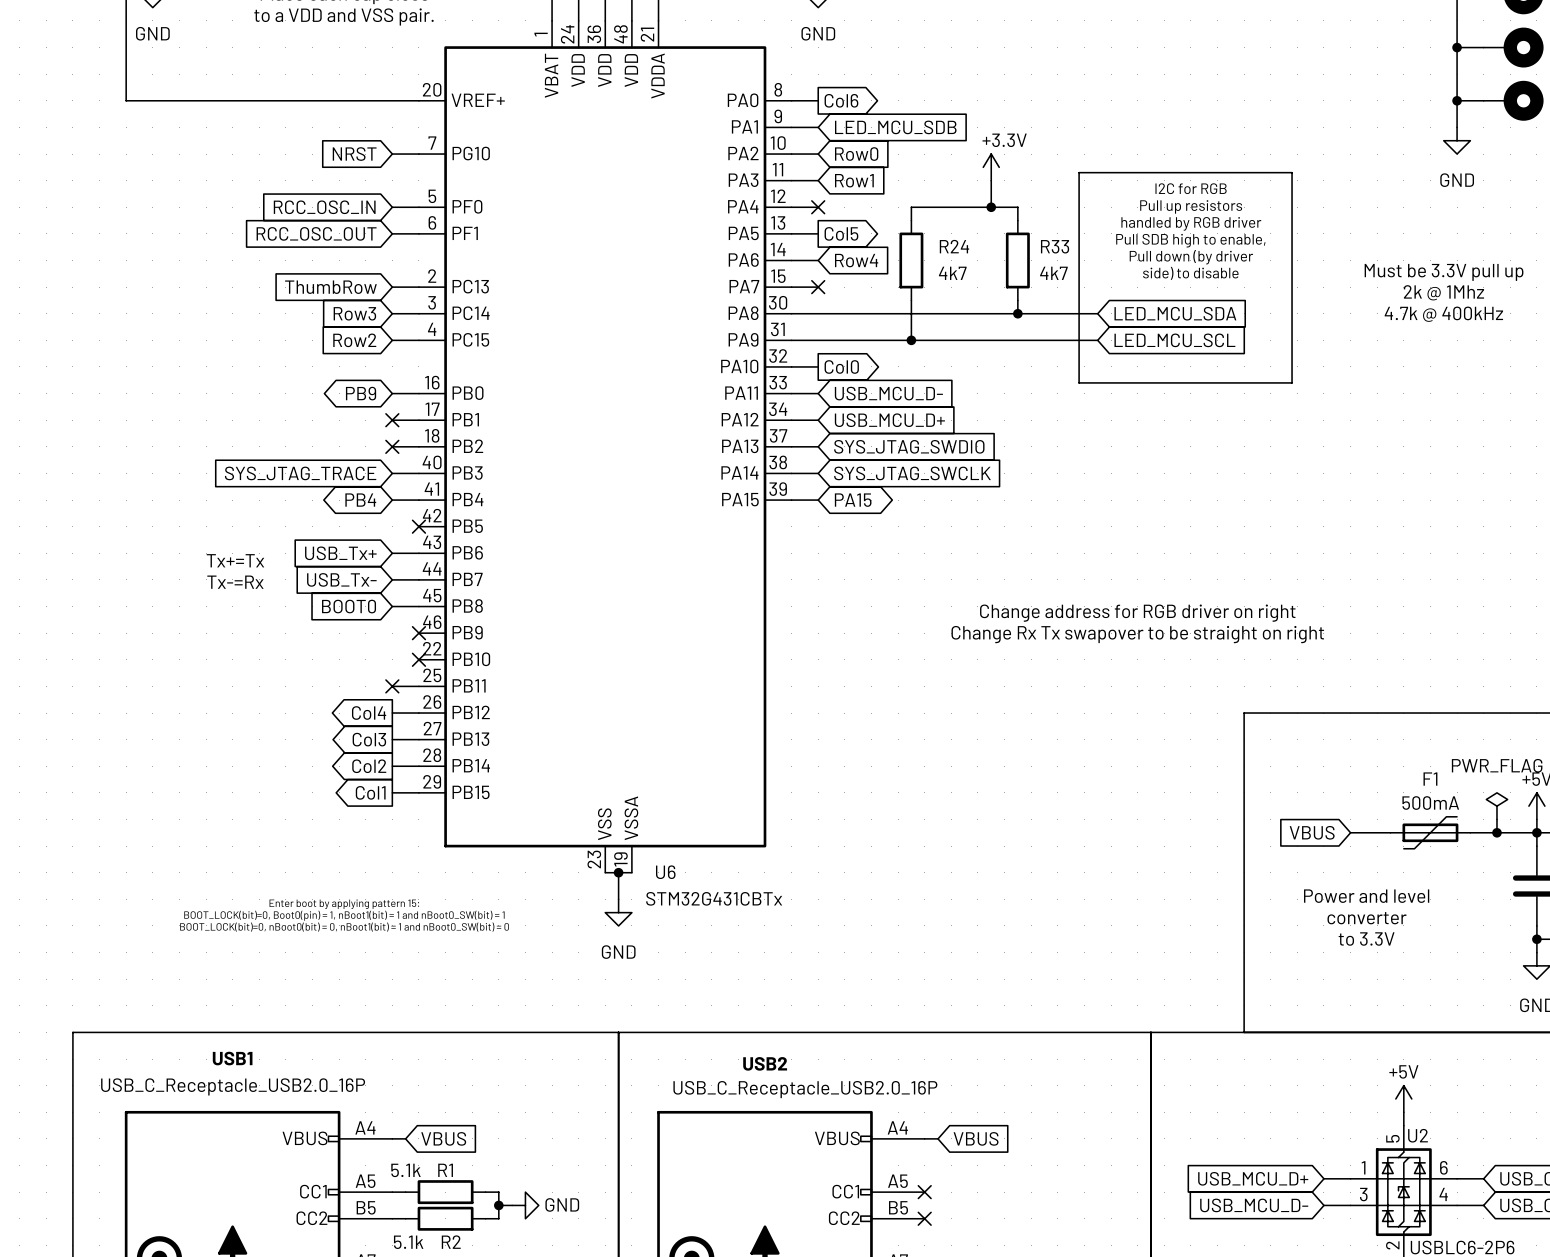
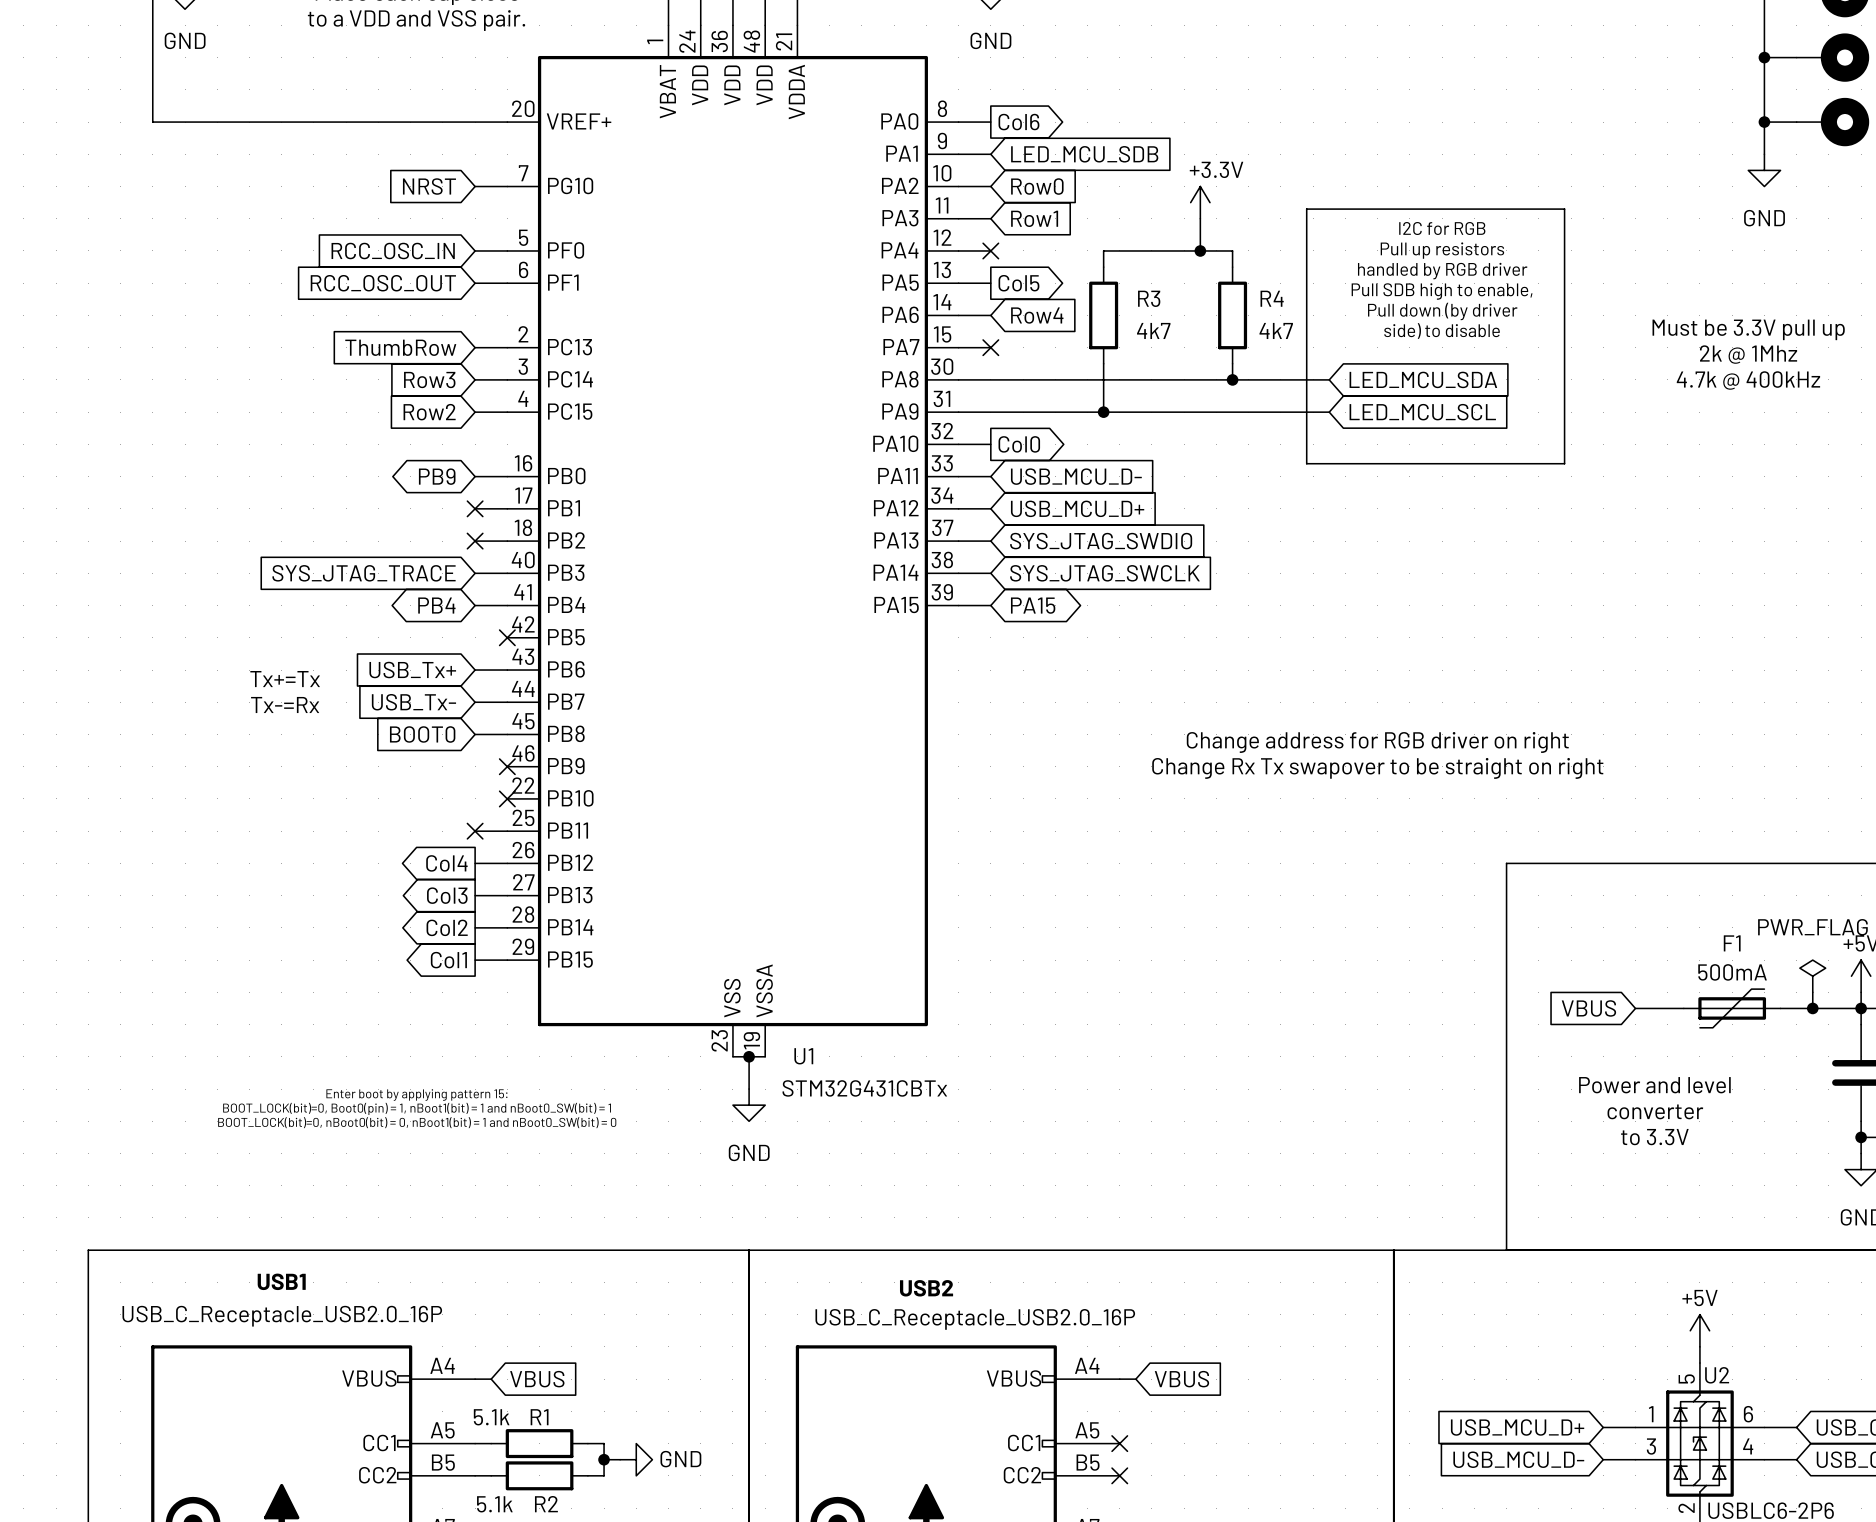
R24 name: R24 (954, 246) -> R3 (1149, 298)
R33 name: R33 (1055, 246) -> R4 (1272, 298)
U6 name: U6 (665, 872) -> U1 (803, 1056)

